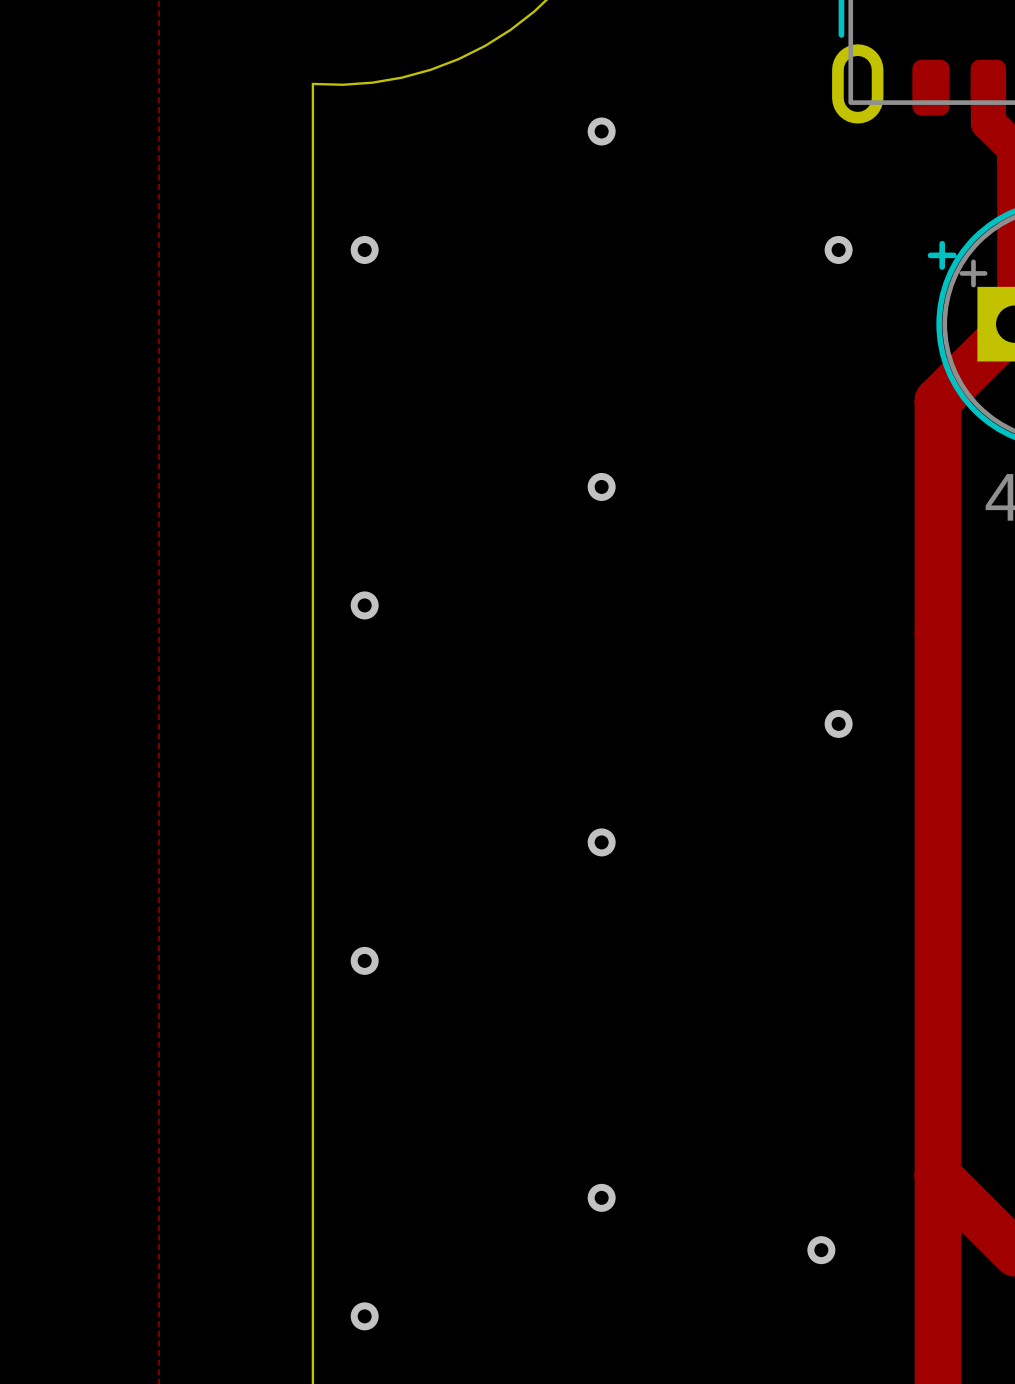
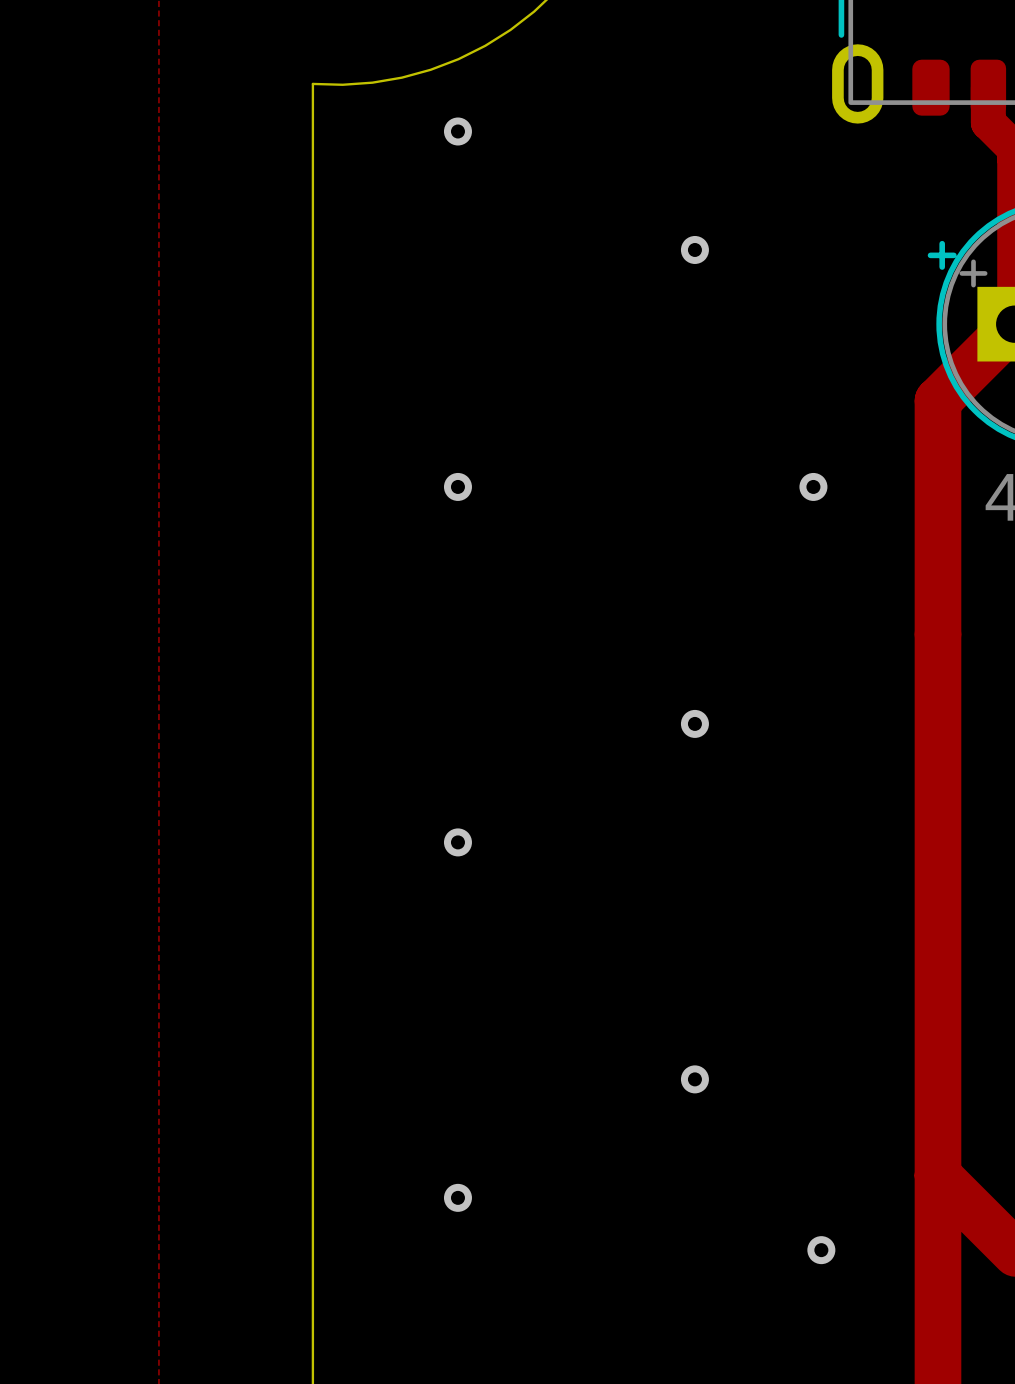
via: none -> (457, 131)
via: (601, 131) -> none
via: (364, 249) -> none
via: none -> (694, 249)
via: (838, 249) -> none
via: none -> (457, 486)
via: (601, 486) -> none
via: none -> (813, 486)
via: (364, 605) -> none
via: none -> (694, 723)
via: (838, 723) -> none
via: none -> (457, 842)
via: (601, 842) -> none
via: (364, 960) -> none
via: none -> (694, 1079)
via: none -> (457, 1197)
via: (601, 1197) -> none
via: (364, 1316) -> none

